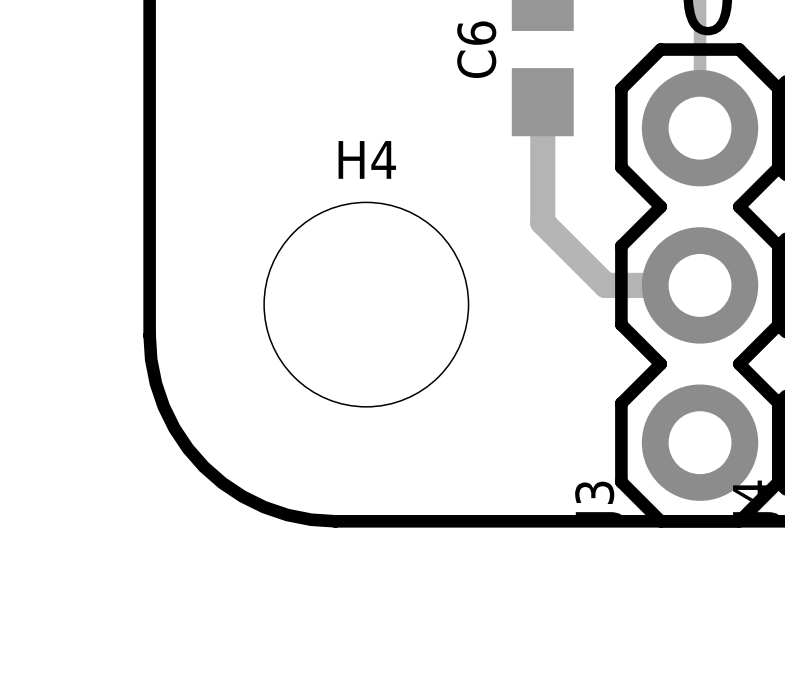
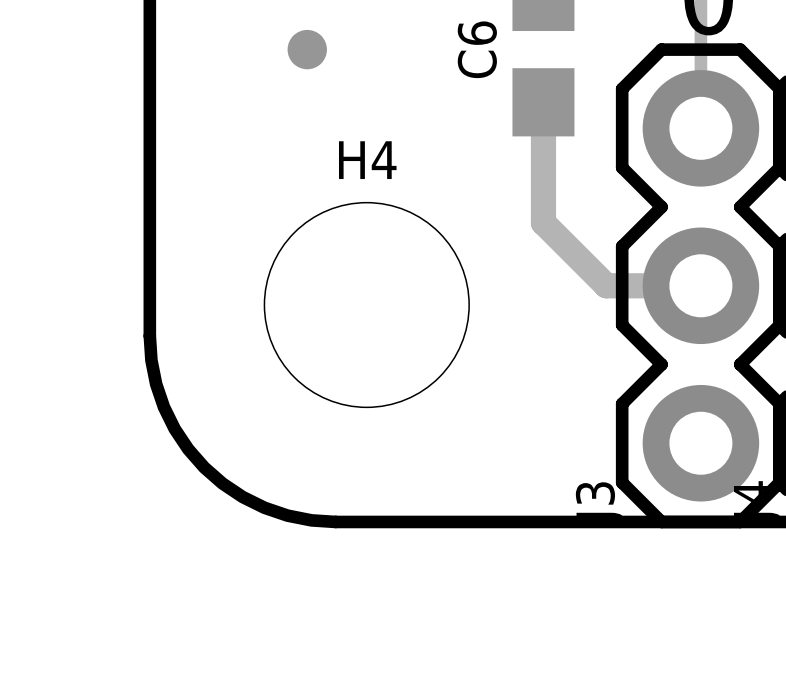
part: none -> (307, 49)

